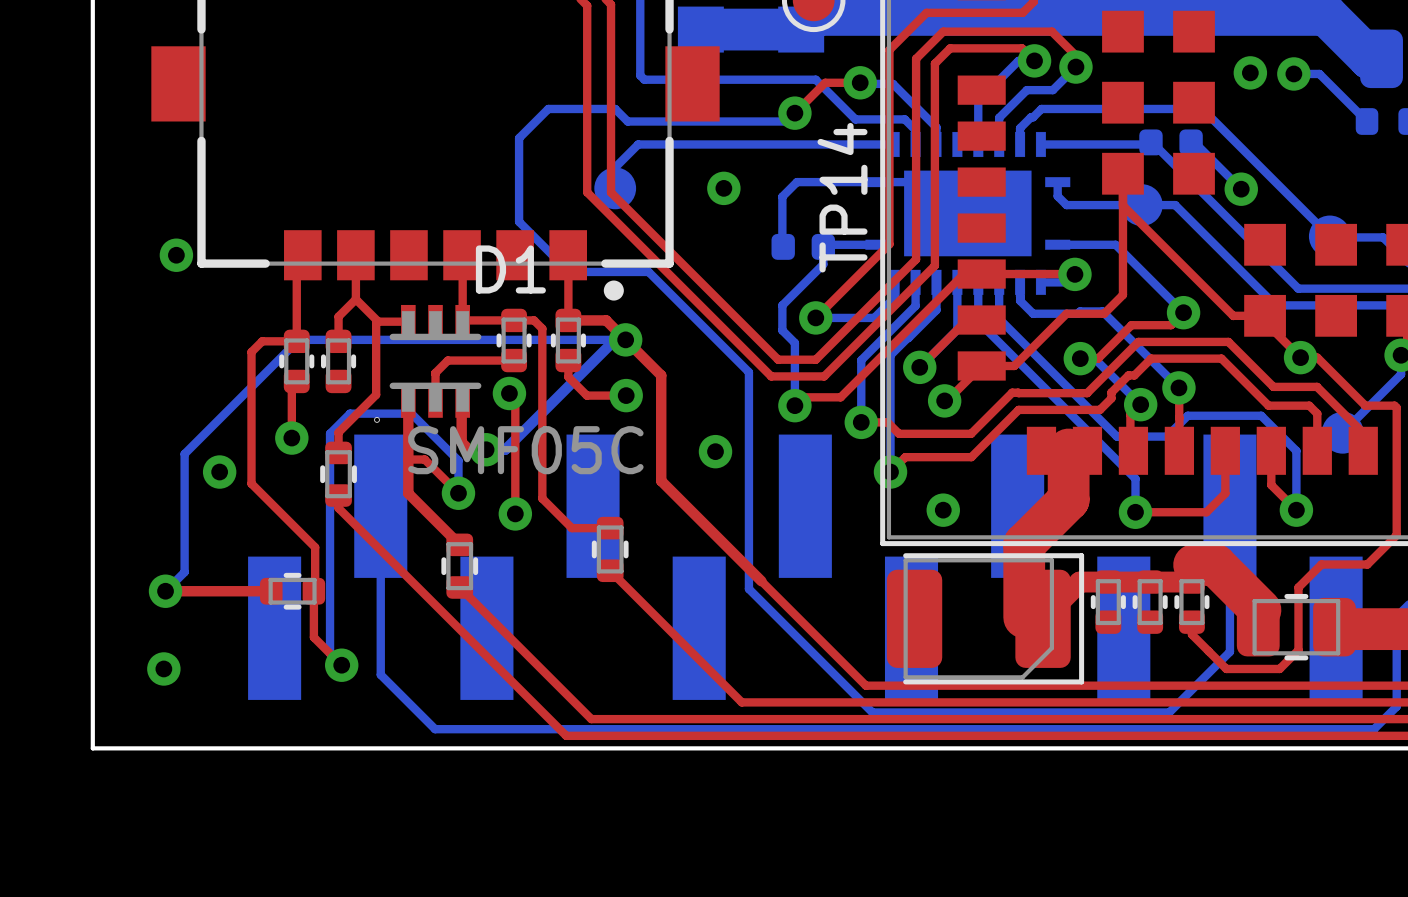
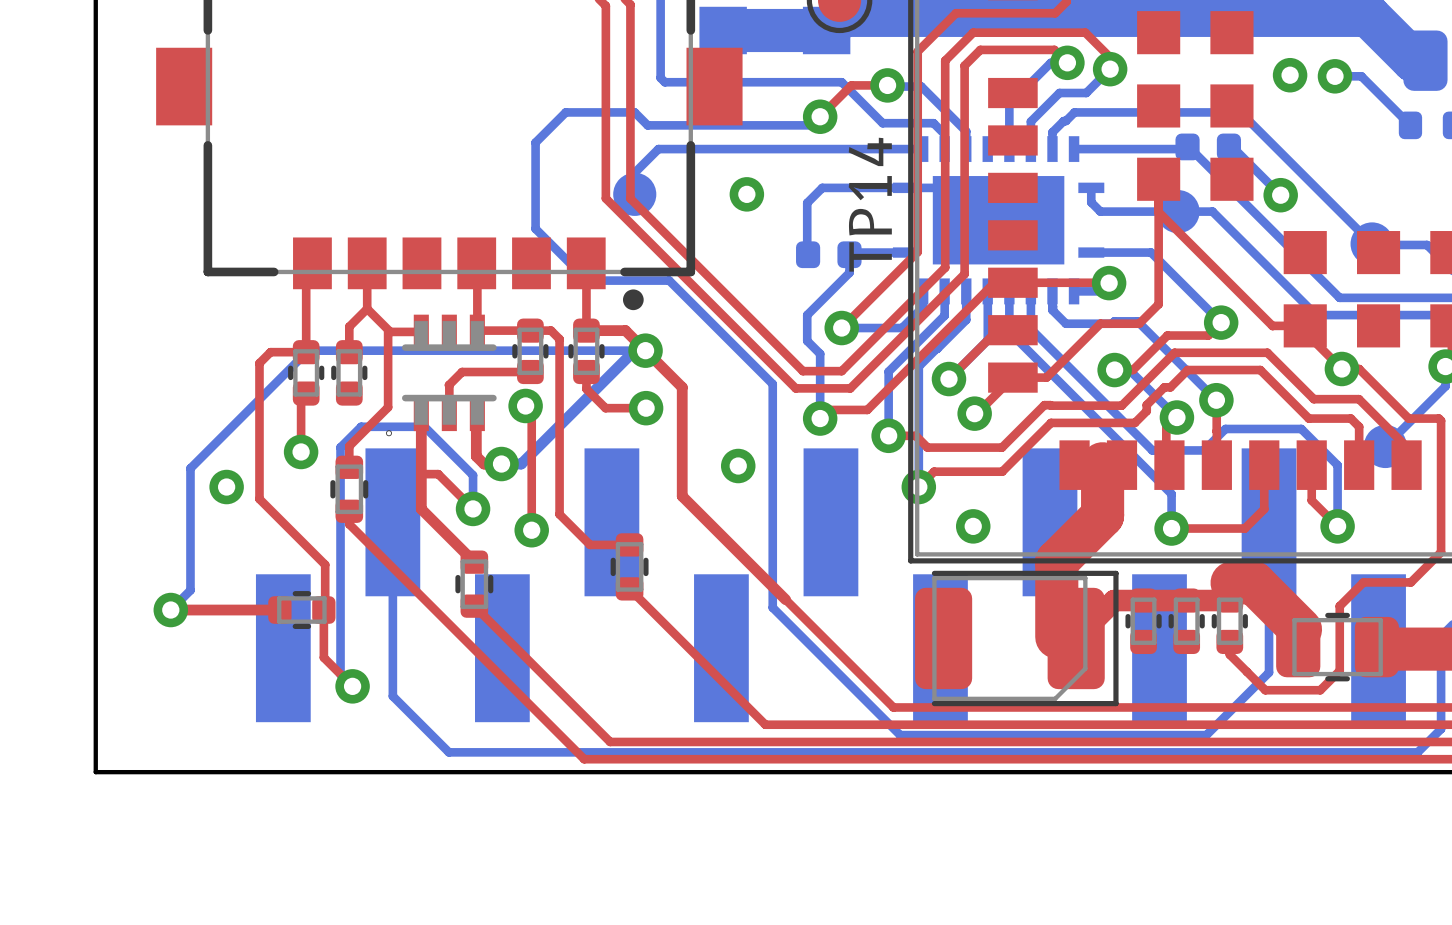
via: (176, 255) -> none
D1 name: D1 (510, 269) -> none
D1 value: SMF05C (525, 450) -> none
via: (163, 668) -> none

